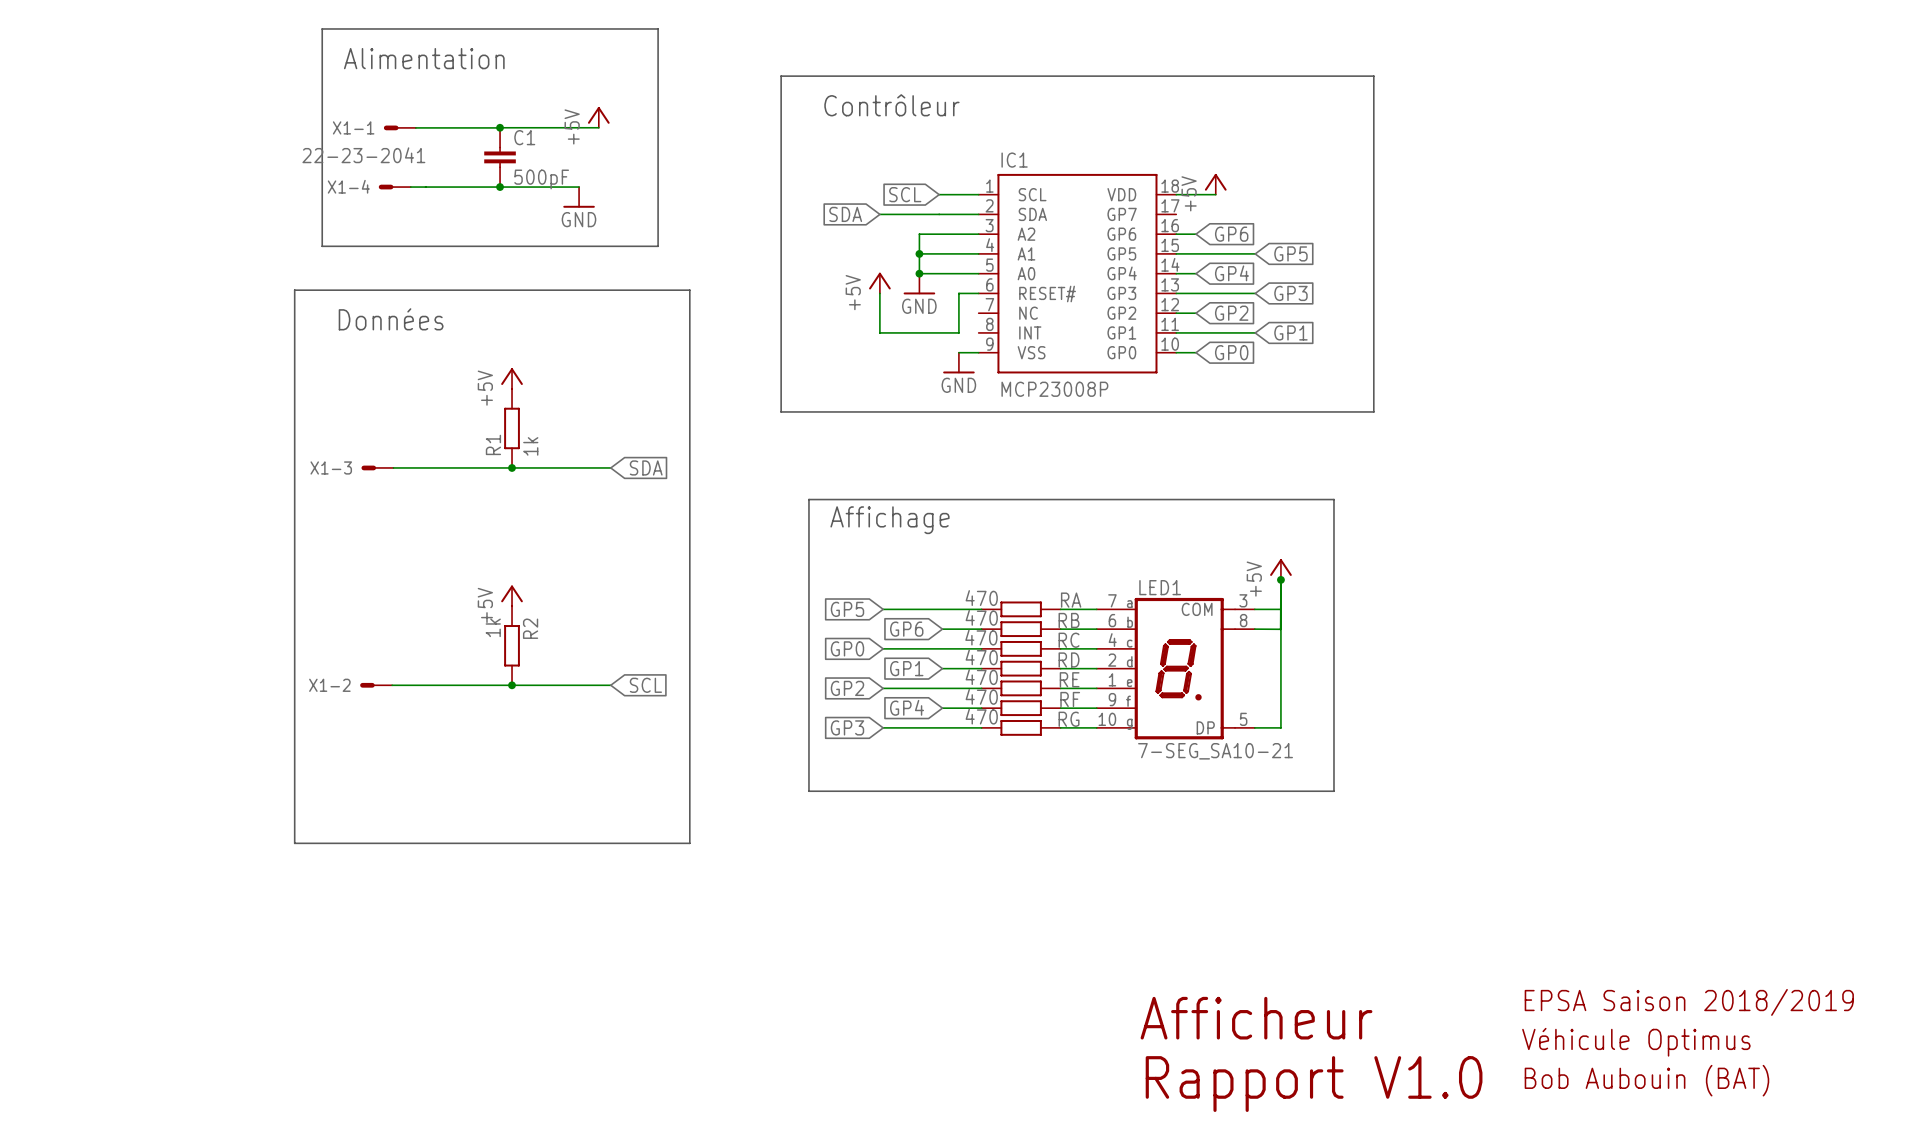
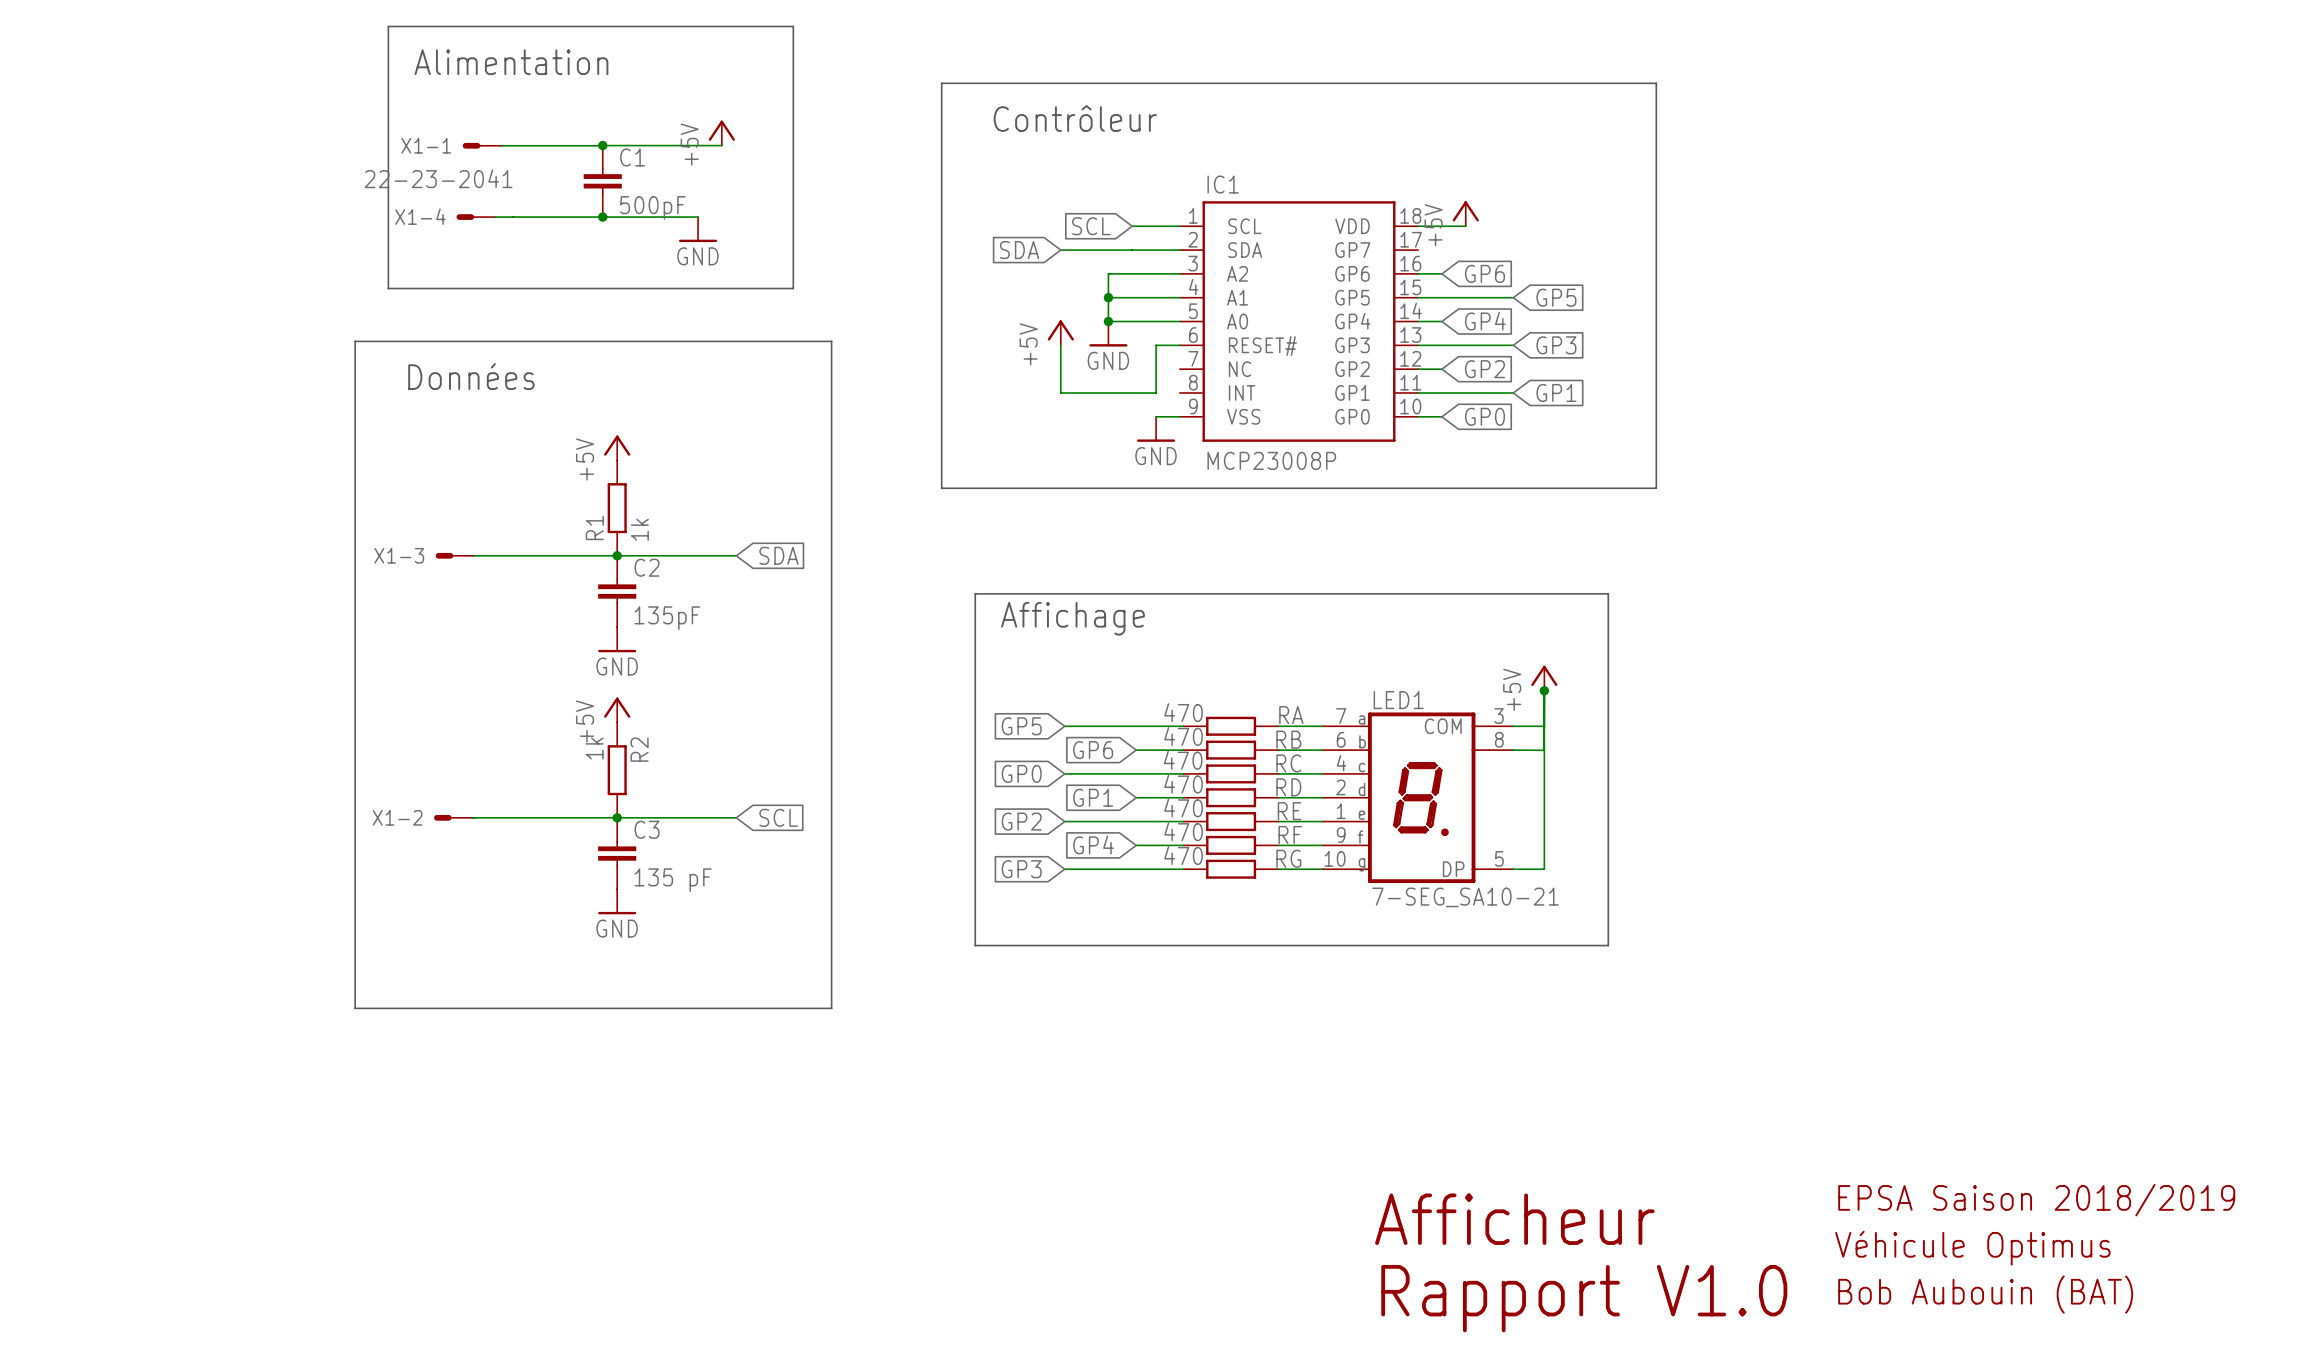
C2: none -> 135pF (617, 591)
power symbol: none -> GND (617, 639)
C3: none -> 135 pF (617, 853)
power symbol: none -> GND (617, 901)

